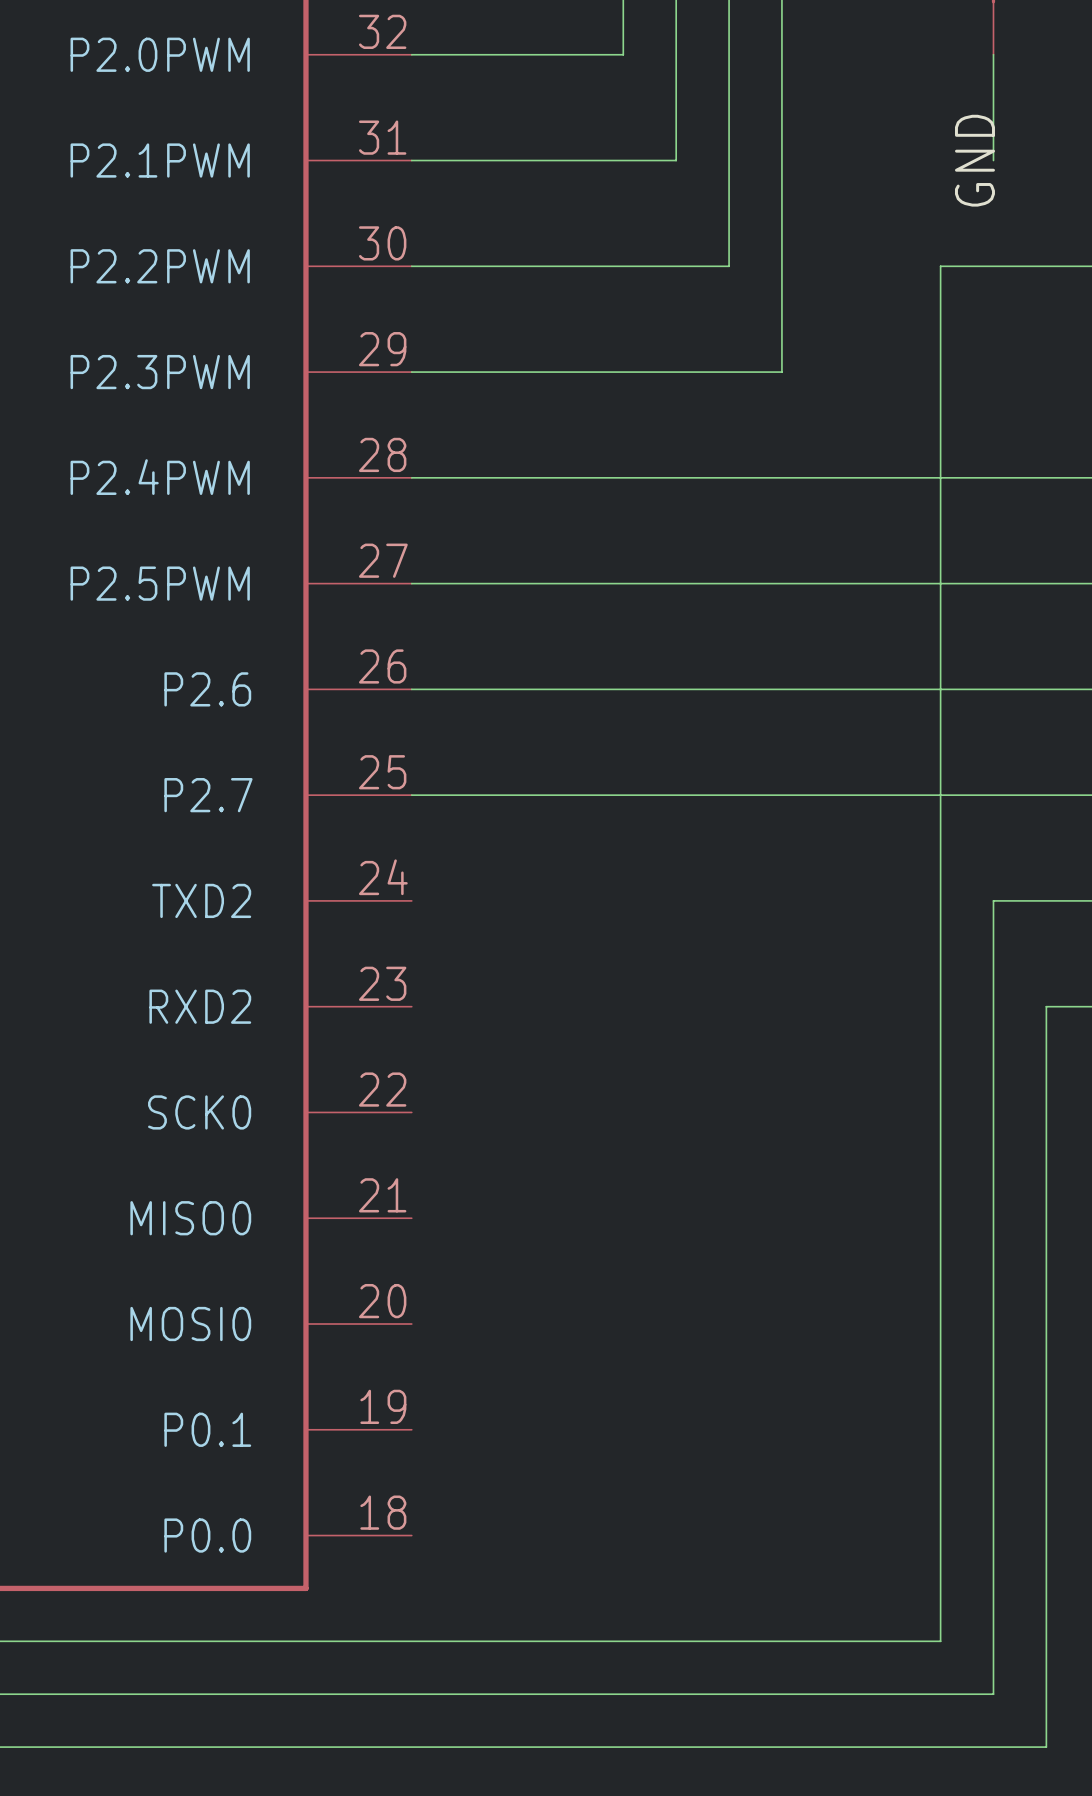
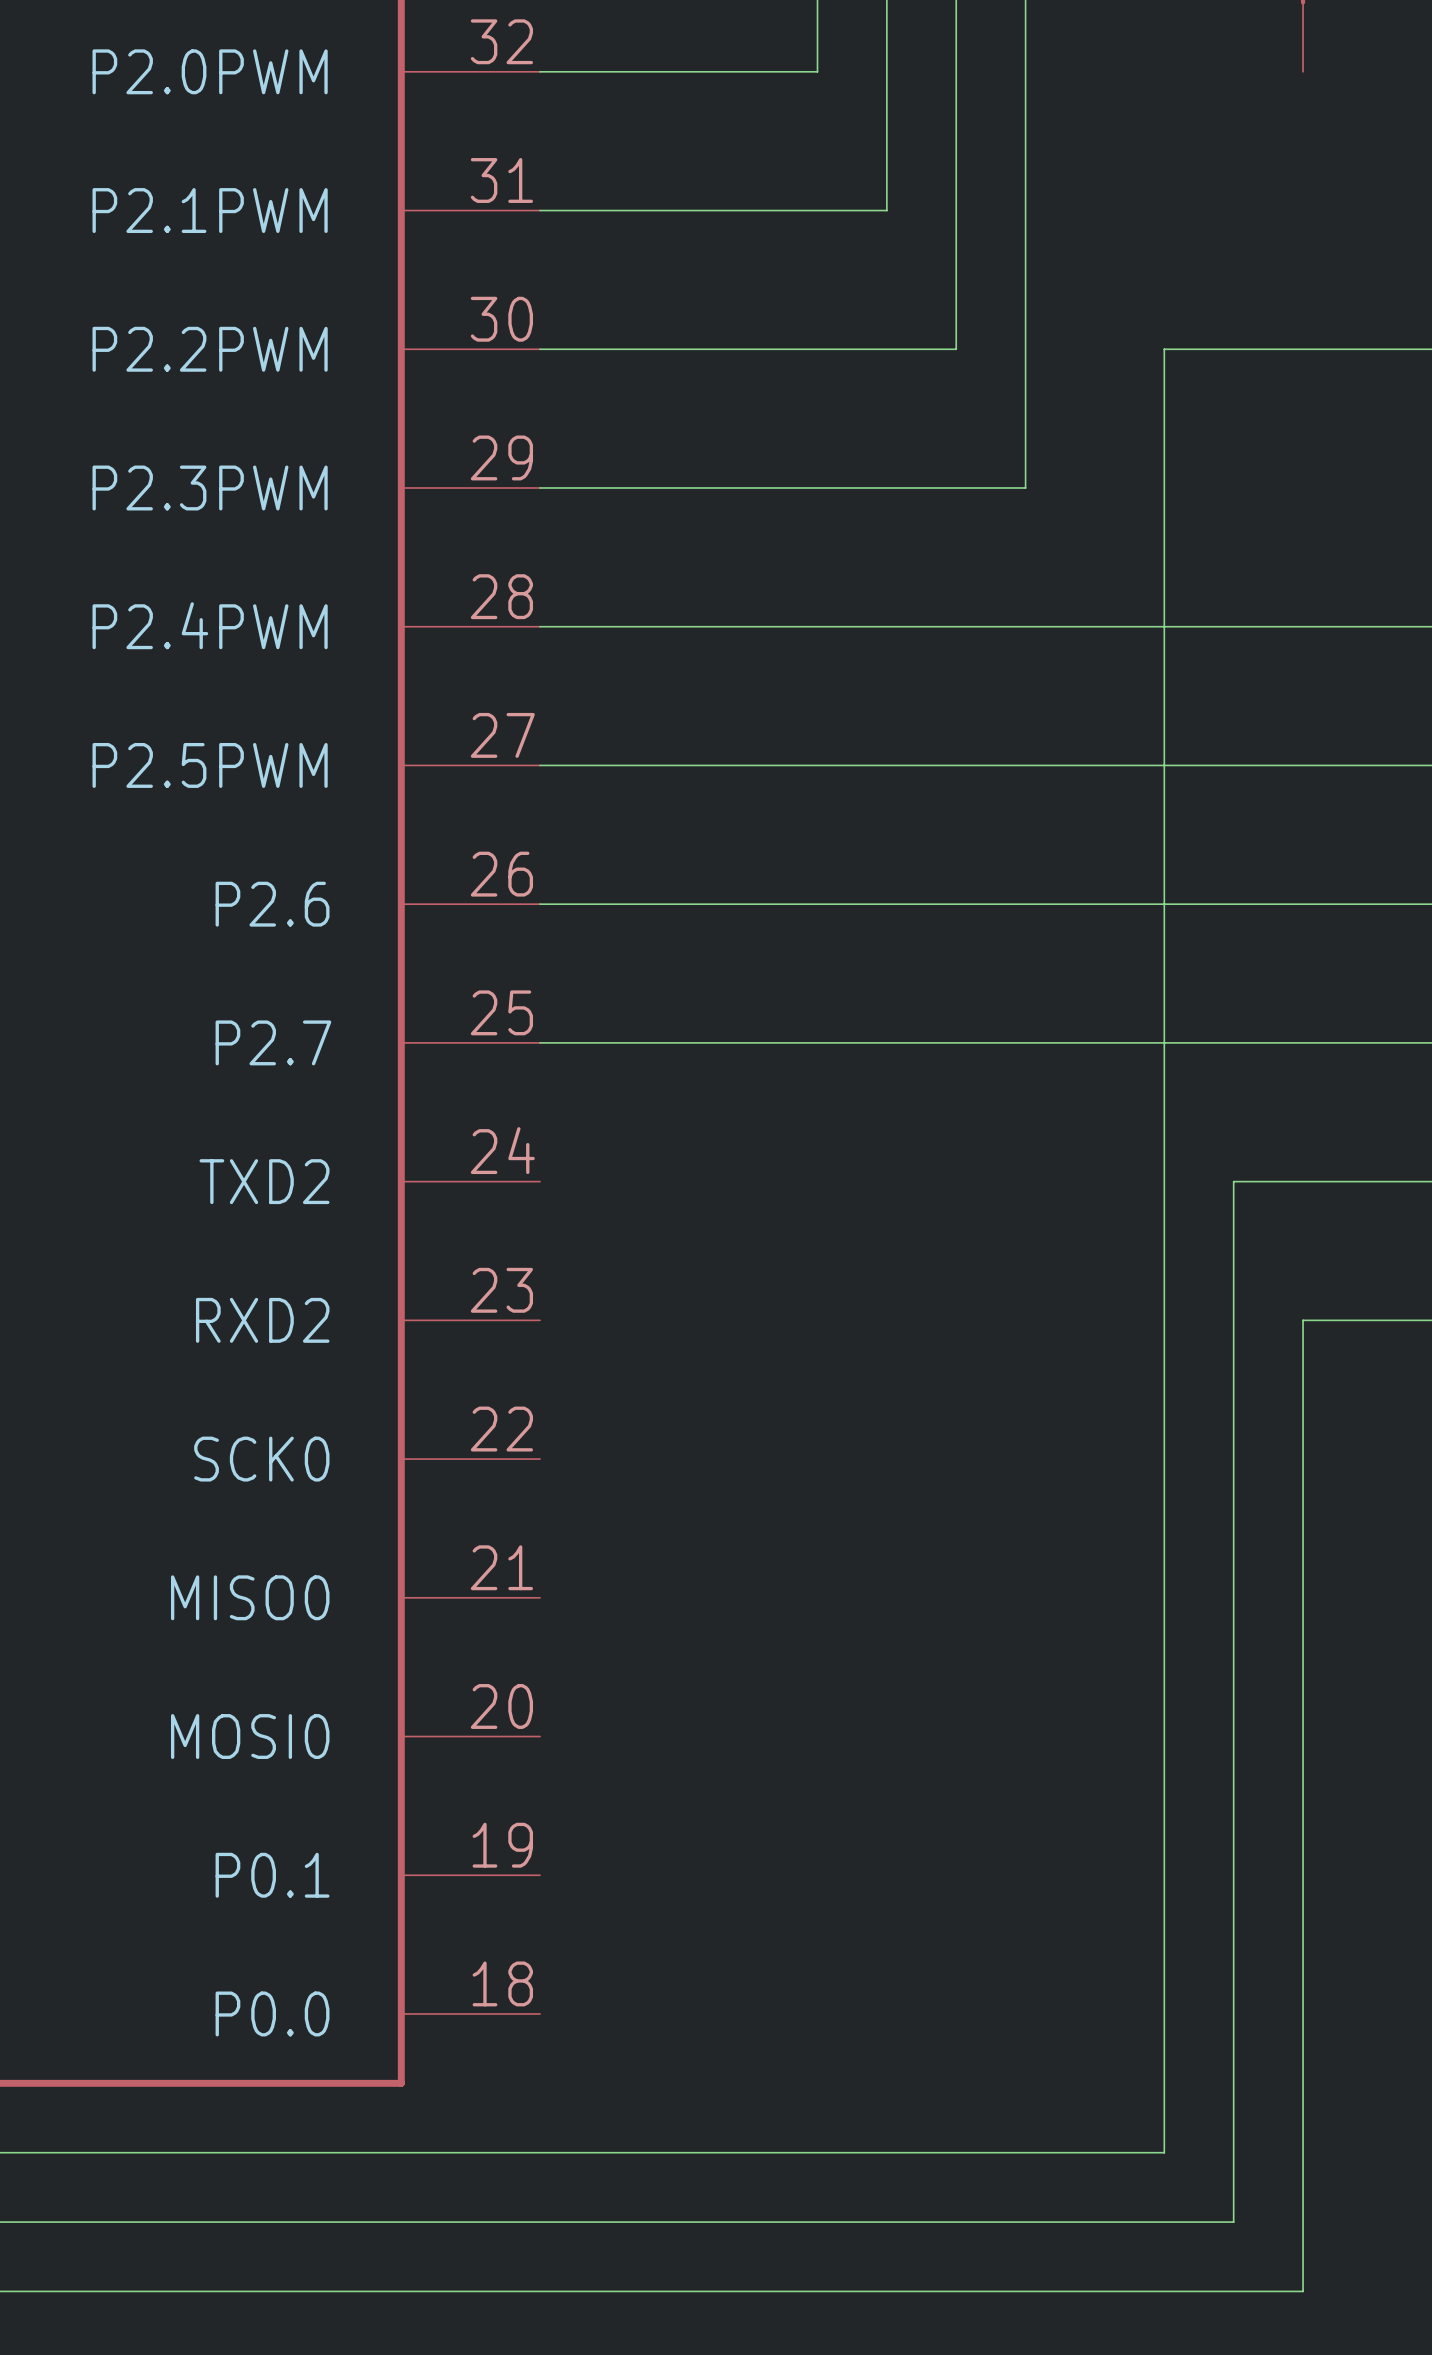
wire: (993, 54) (993, 160) -> none
label: GND (974, 160) -> none
wire: (940, 266) (940, 900) -> (1303, 1181) (1233, 1181)
wire: none -> (1233, 349) (1164, 349) (1164, 2152)
wire: (993, 900) (993, 1006) -> (1372, 1320) (1303, 1320)
wire: (1046, 1006) (1046, 1747) (993, 1747) -> none
wire: (887, 1641) (940, 1641) -> (1233, 2222) (1233, 2152)
wire: (940, 1694) (993, 1694) -> (1303, 2291) (1303, 2222)

